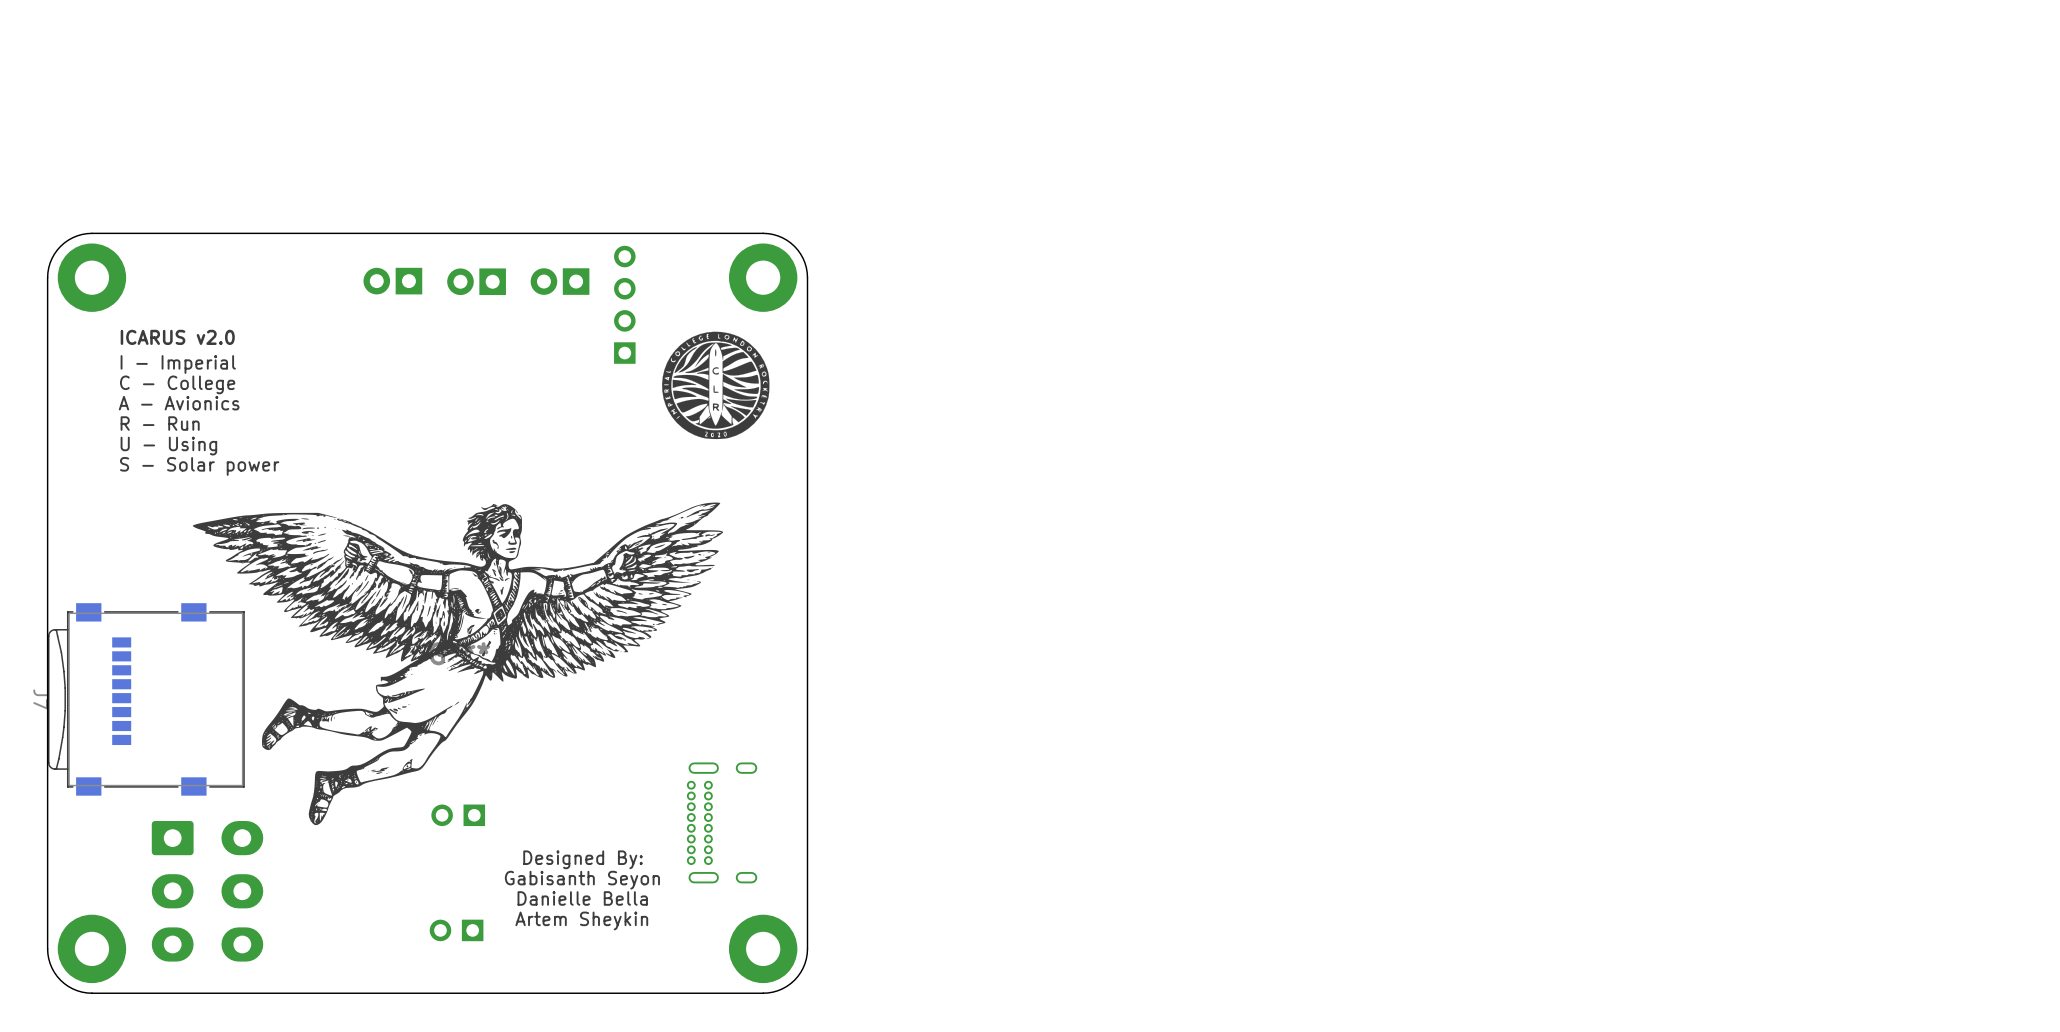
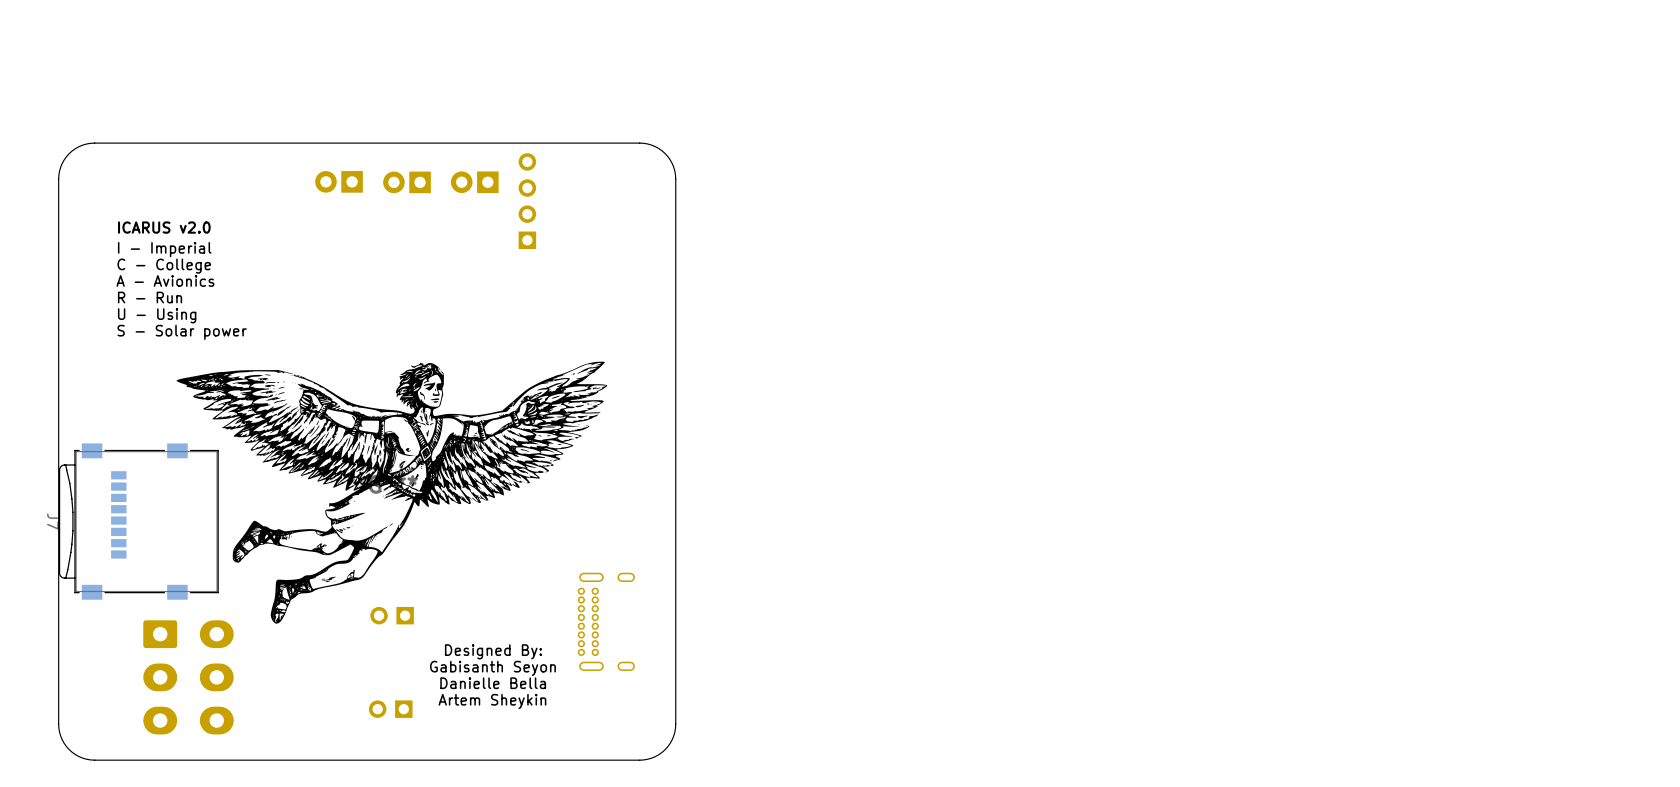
part: (91, 277) -> none
part: (763, 277) -> none
drawing: [662, 331, 770, 440] -> none
part: (91, 948) -> none
part: (763, 948) -> none

